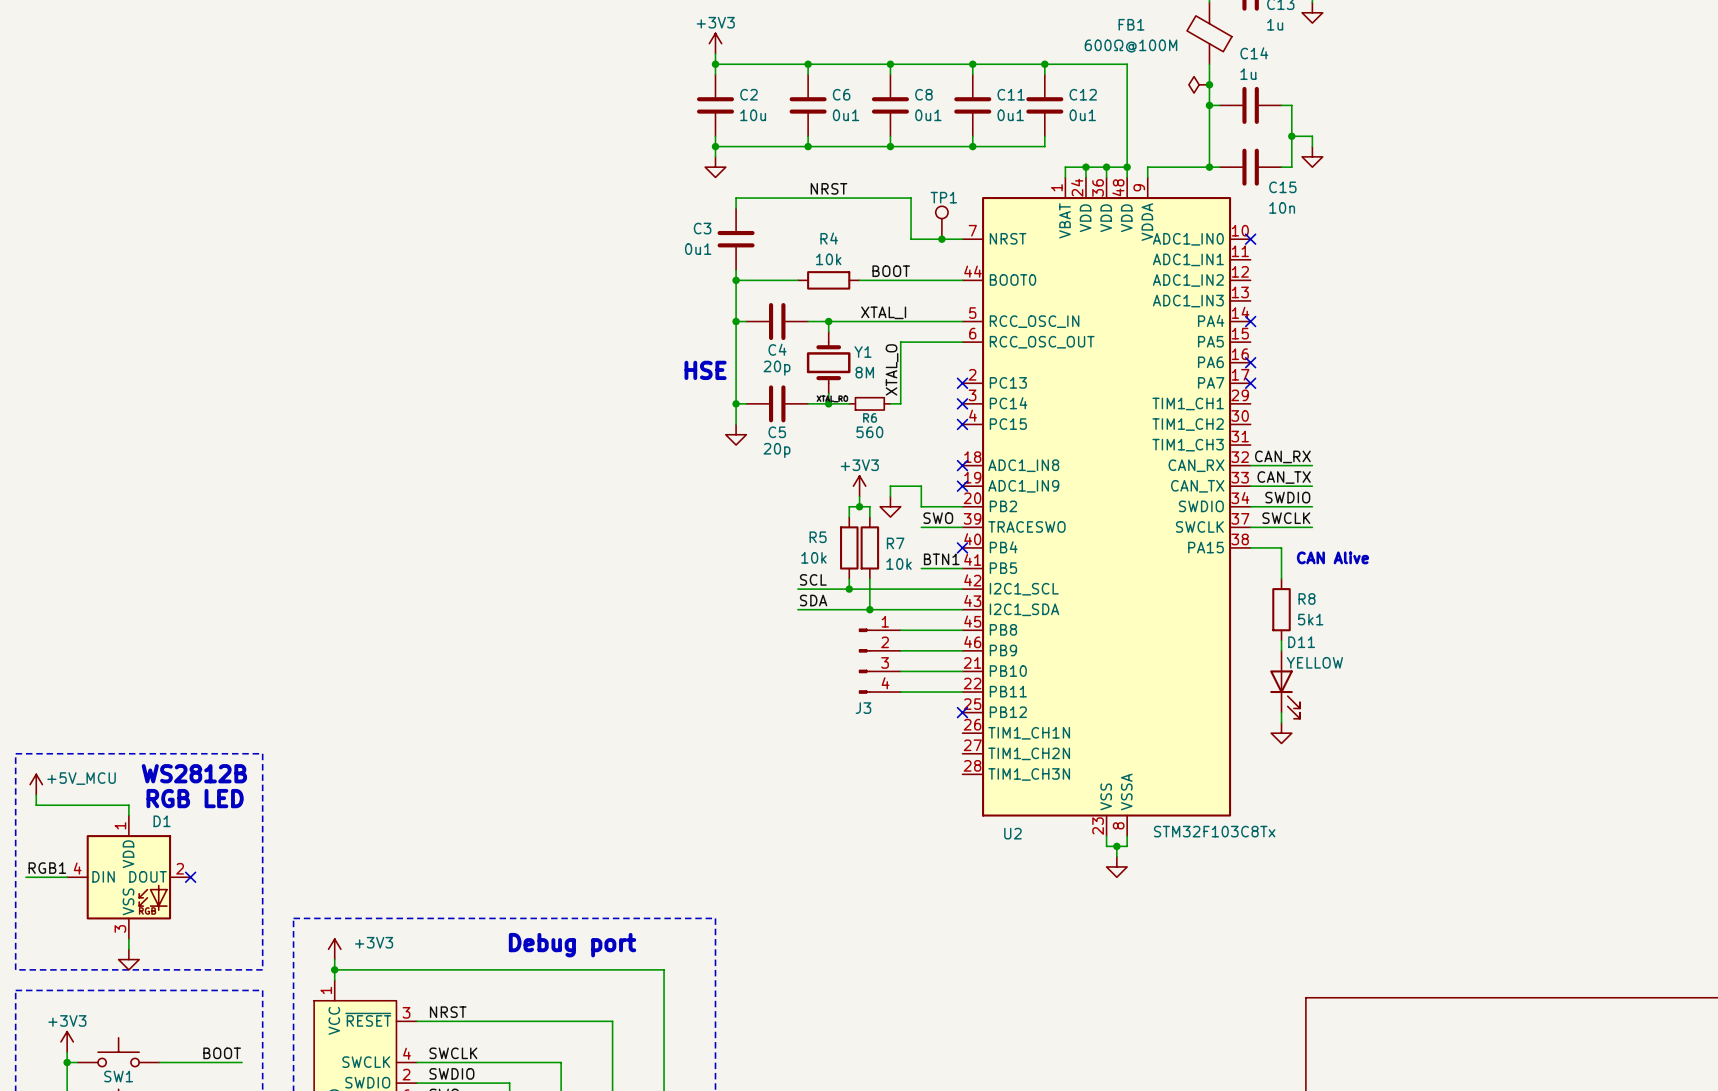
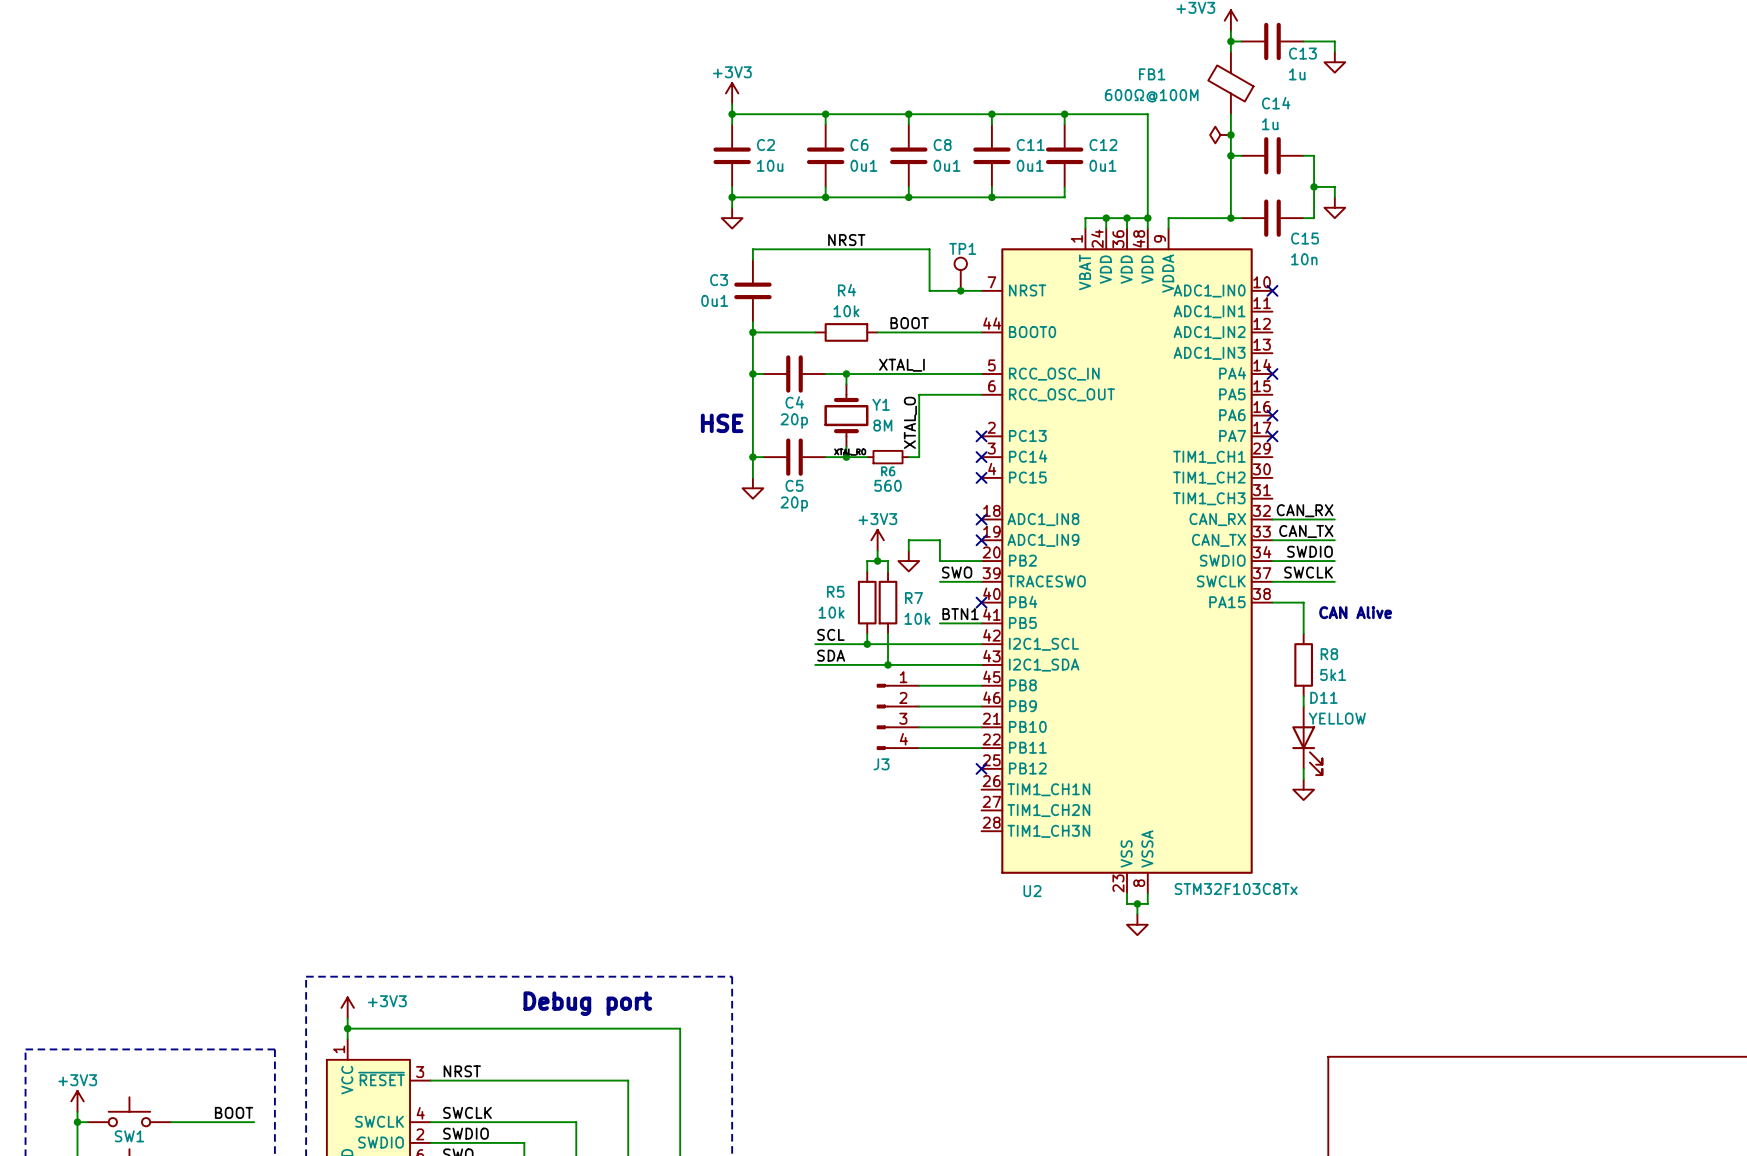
line: (15, 753) (262, 753) (262, 969) (15, 969) (15, 753) -> none
text: WS2812B (194, 773) -> none
power symbol: +5V_MCU (36, 784) -> none
wire: (36, 794) (36, 805) (128, 805) (128, 815) -> none
text: RGB LED (195, 798) -> none
label: RGB1 (47, 868) -> none
wire: (25, 877) (67, 877) -> none
D1: (128, 877) -> none
no-connect mark: (190, 877) -> none
wire: (128, 939) (128, 949) -> none
power symbol: (128, 959) -> none

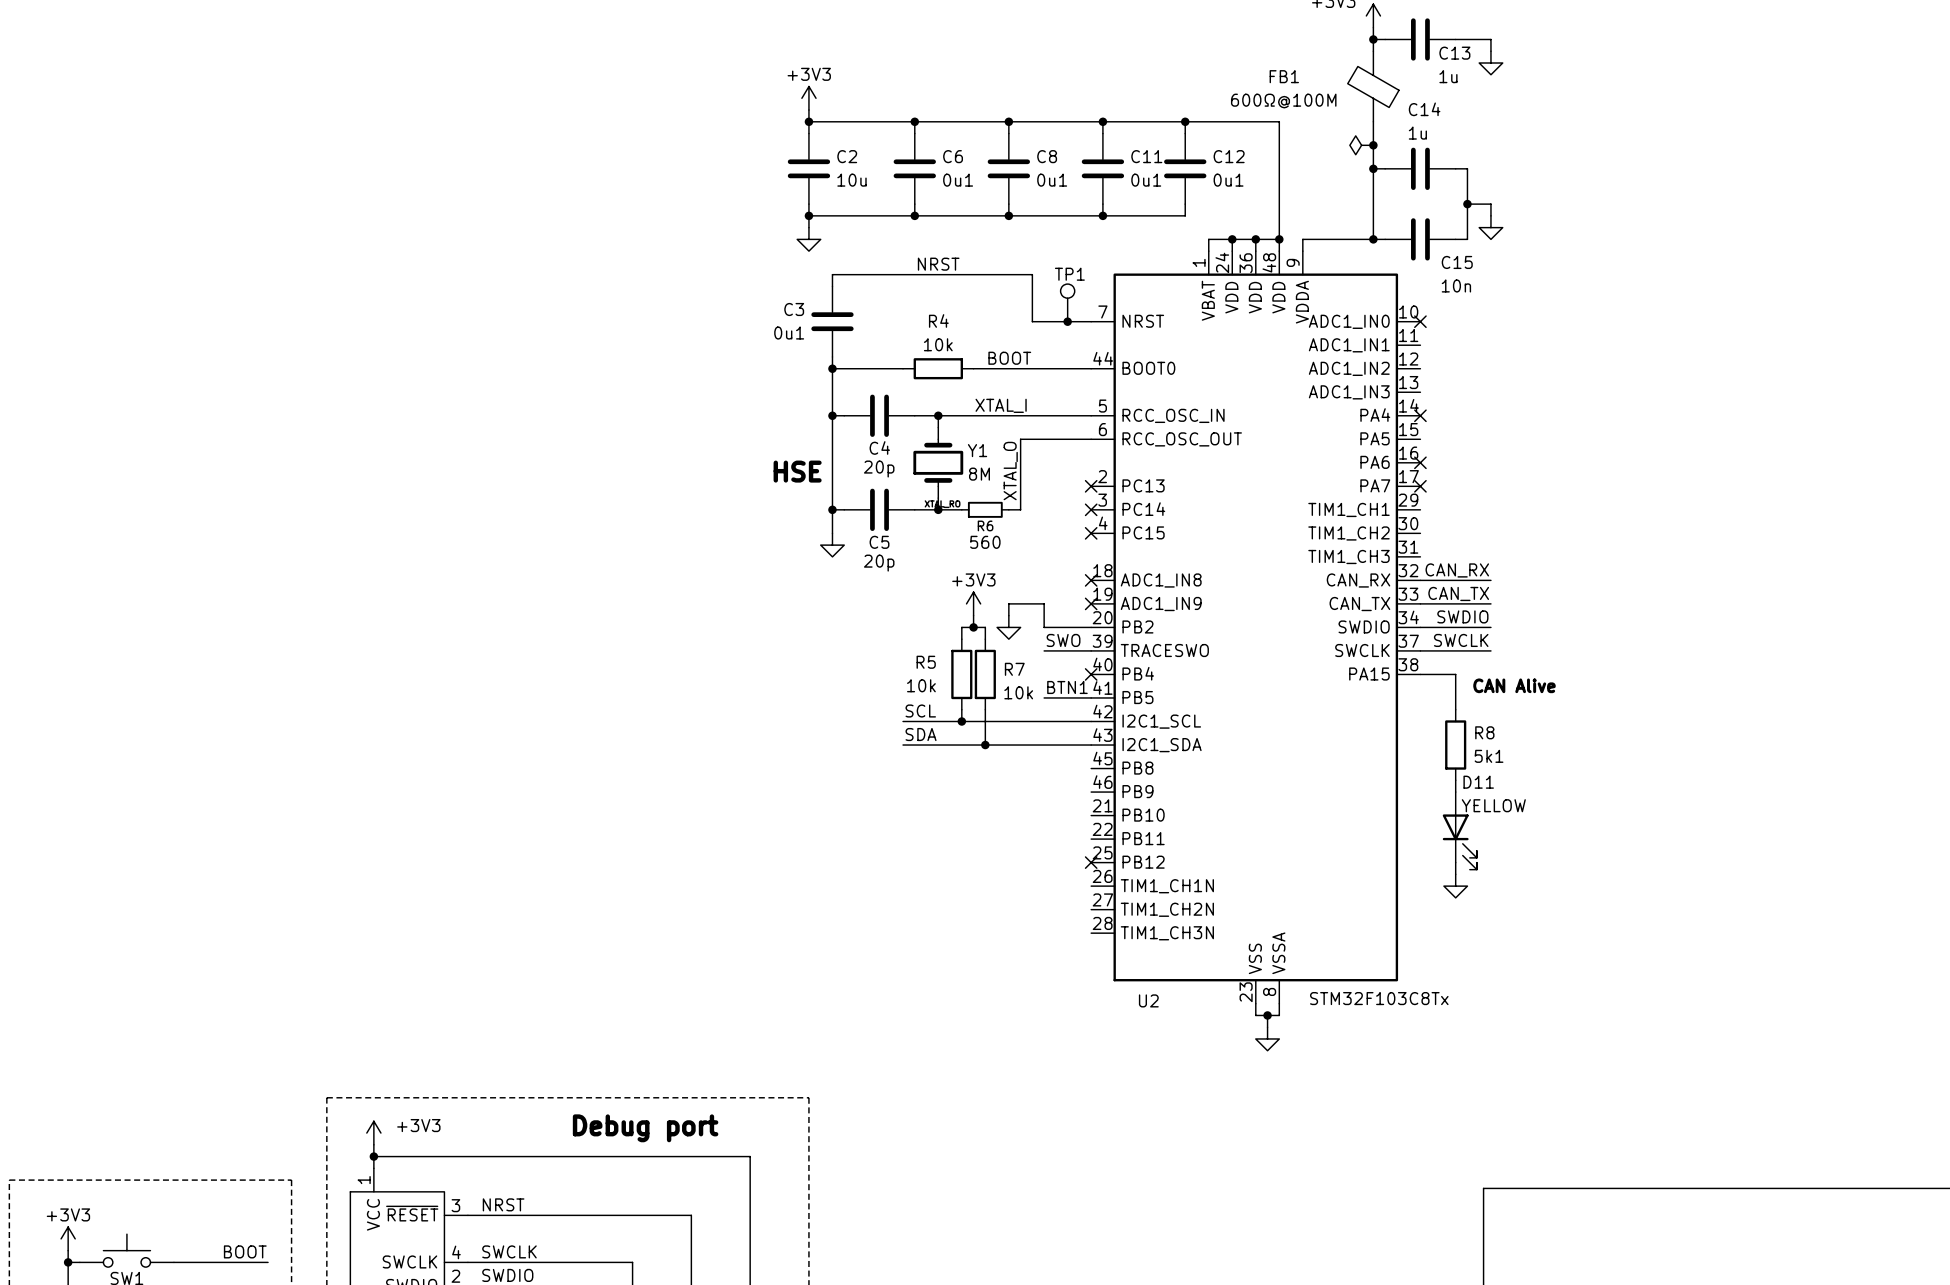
wire: (919, 685) (981, 685) -> none
wire: (919, 706) (981, 706) -> none
J3: (898, 716) -> none
wire: (919, 727) (981, 727) -> none
wire: (919, 748) (981, 748) -> none

